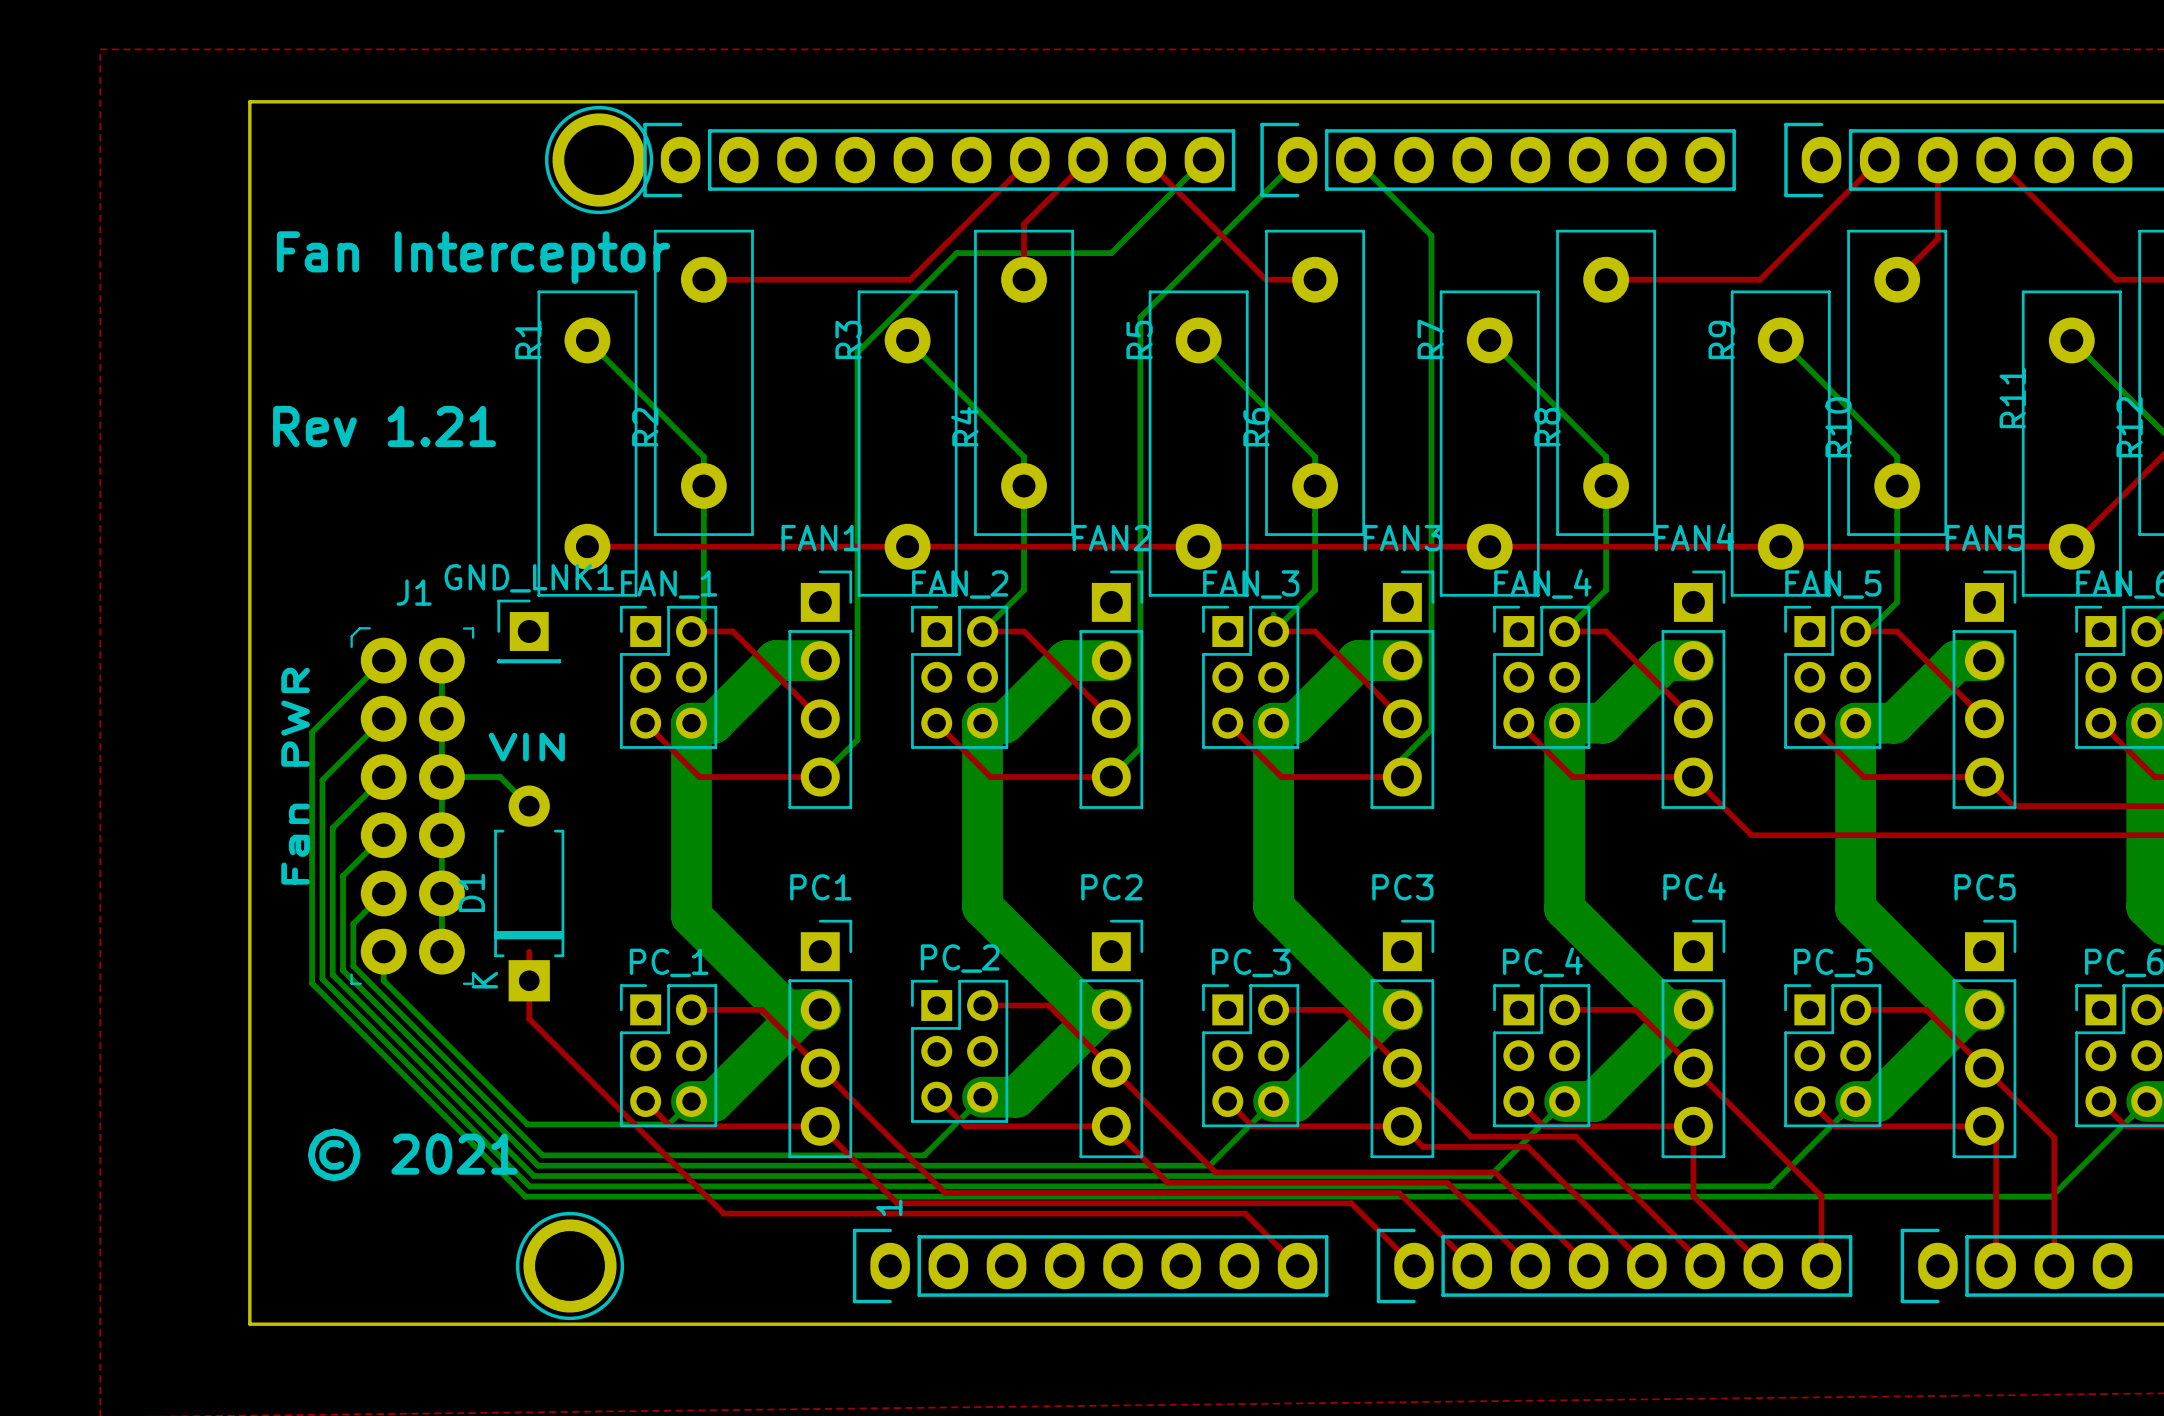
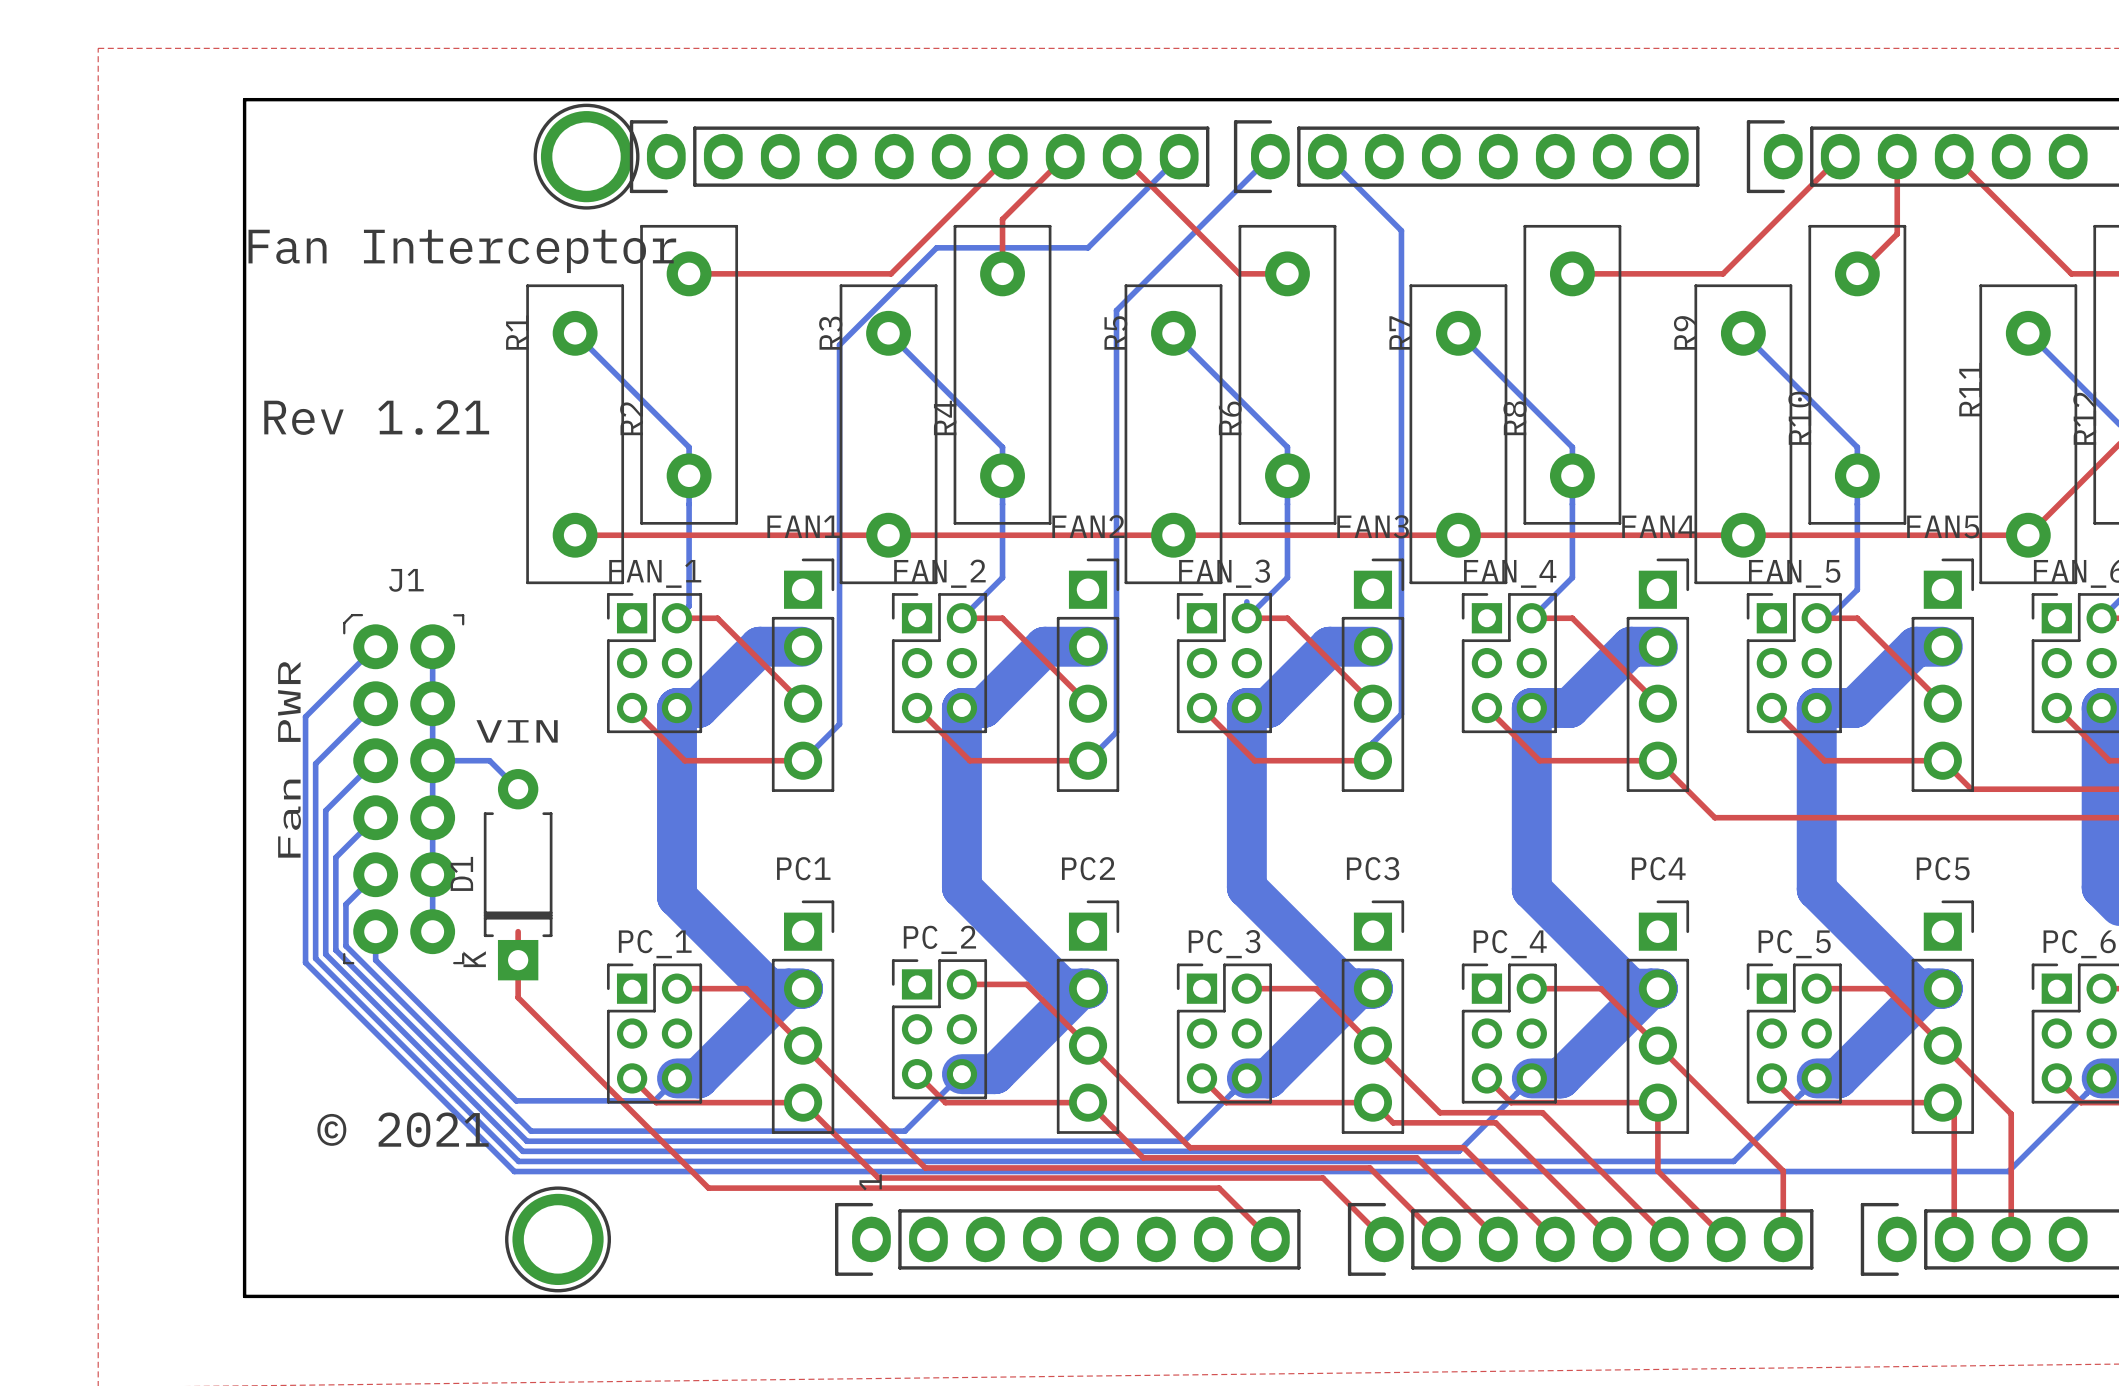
GND_LNK1: (529, 631) -> none

